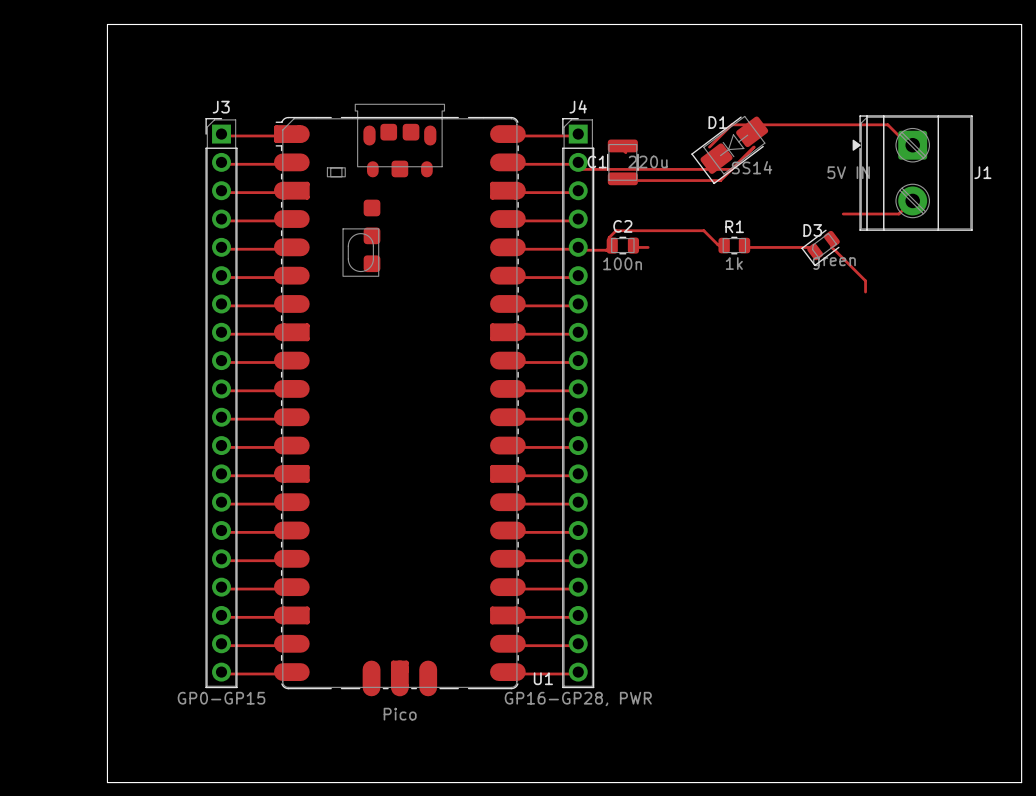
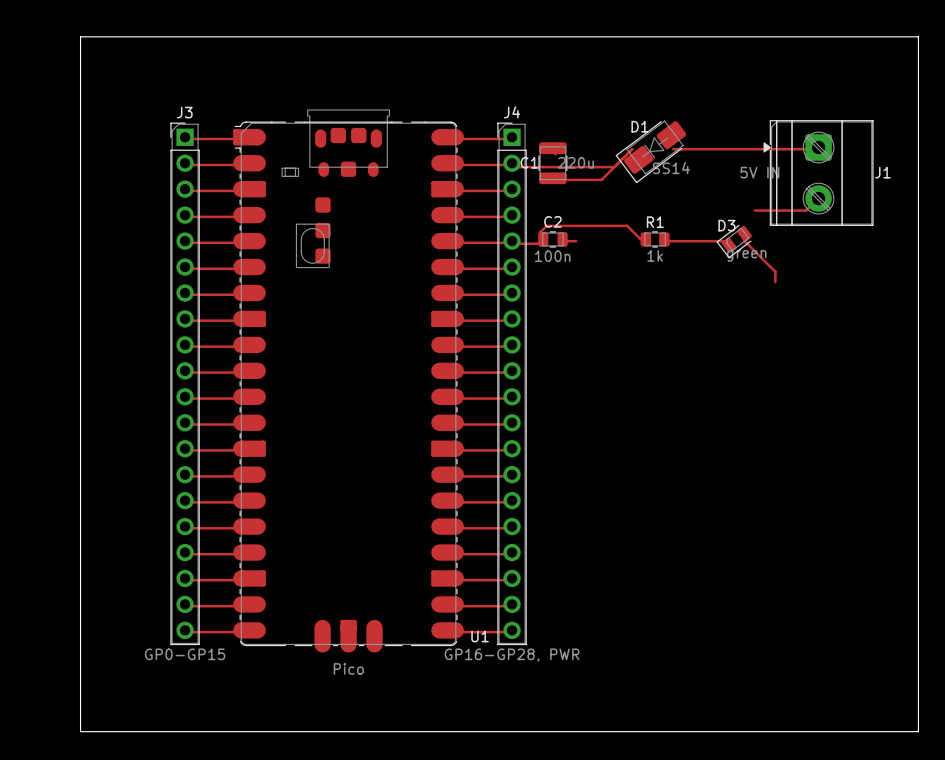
track: (709, 147) (731, 124) (887, 124) (910, 147) -> (673, 149) (816, 149)
track: (754, 147) (720, 180) (676, 180) -> (632, 149) (601, 179)
track: (578, 166) (581, 169) (731, 169) -> (512, 167) (614, 167)

